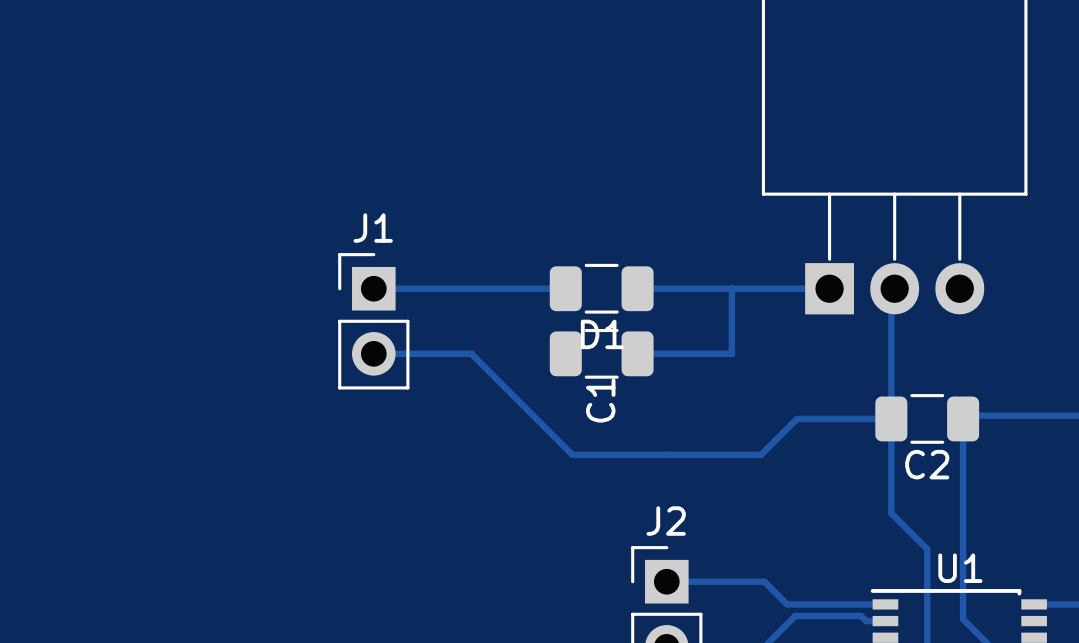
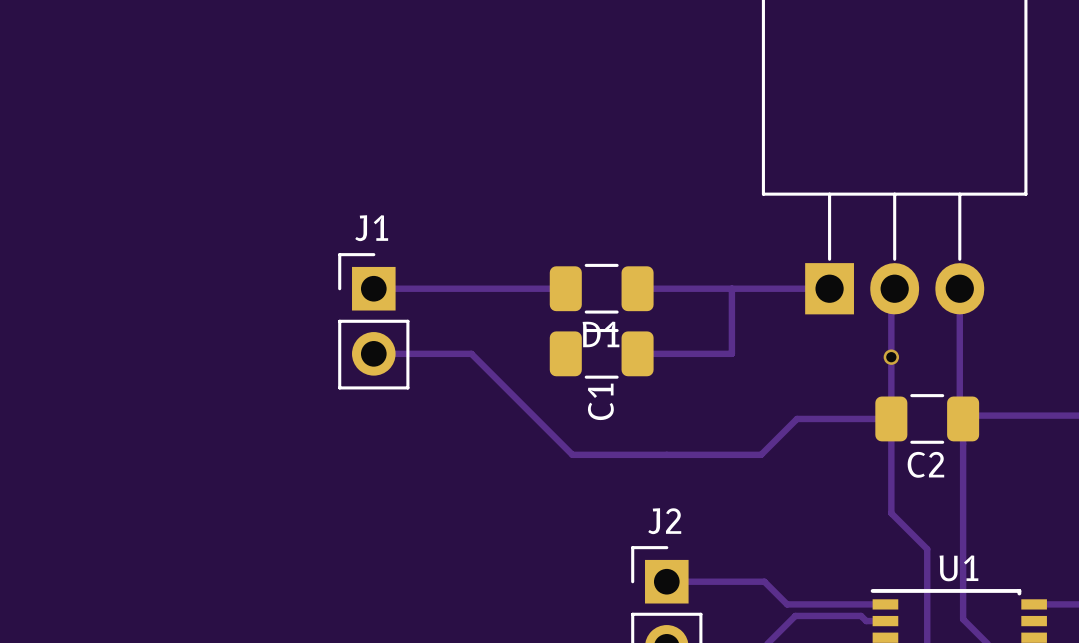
track: none -> (959, 288) (959, 415) (963, 418)
via: none -> (891, 357)

